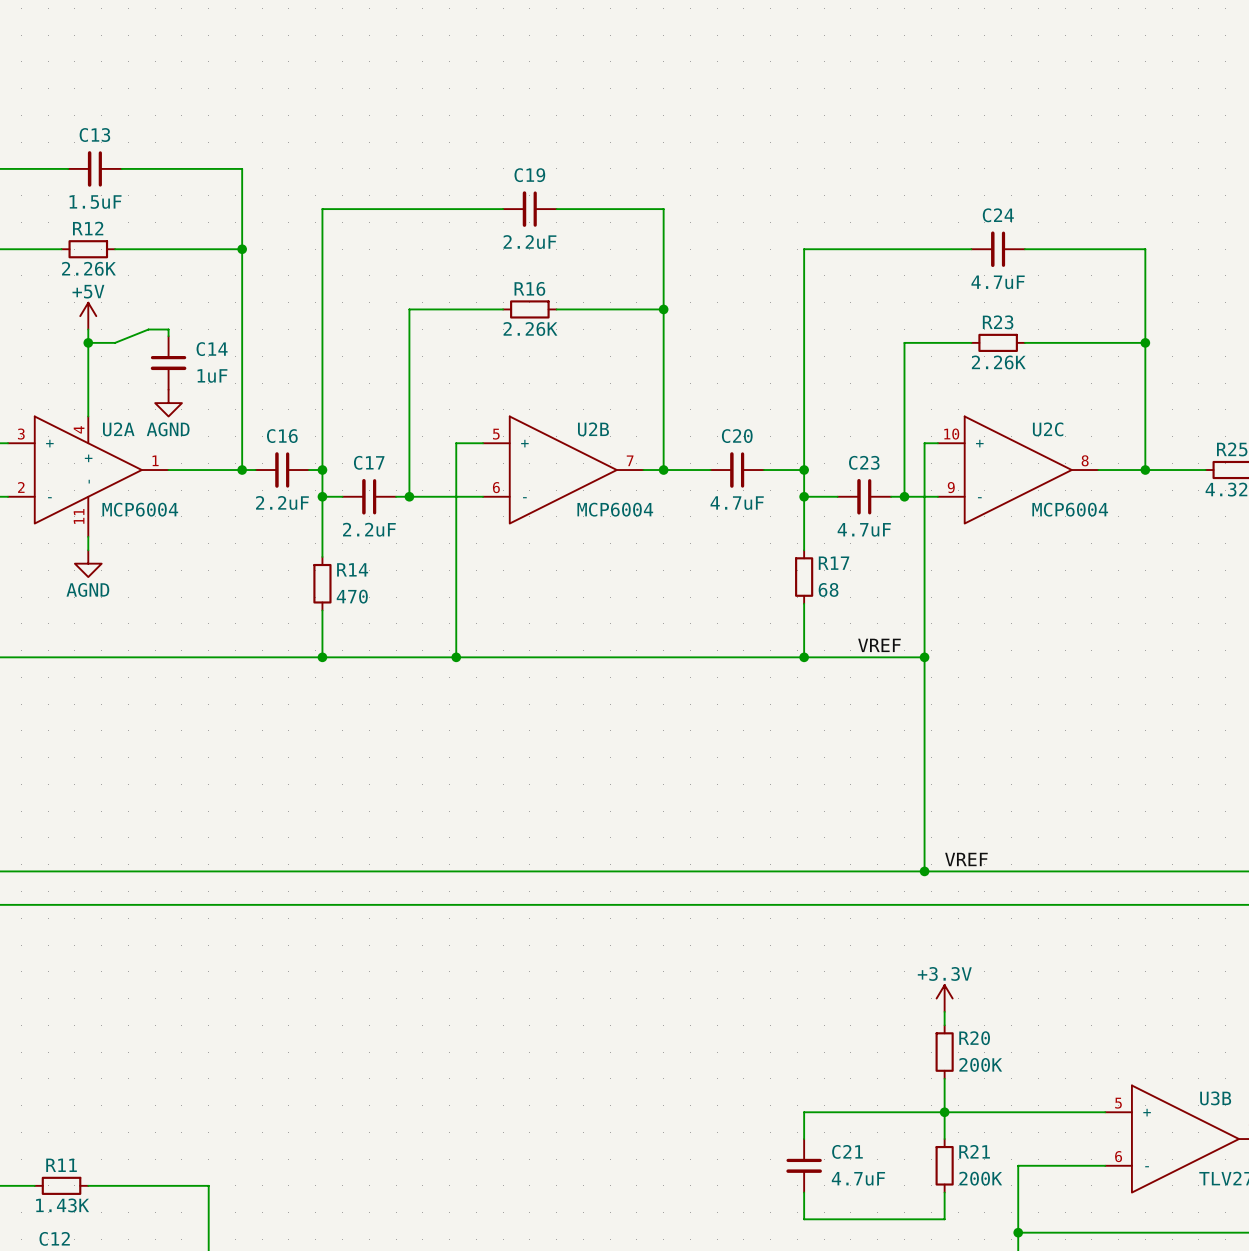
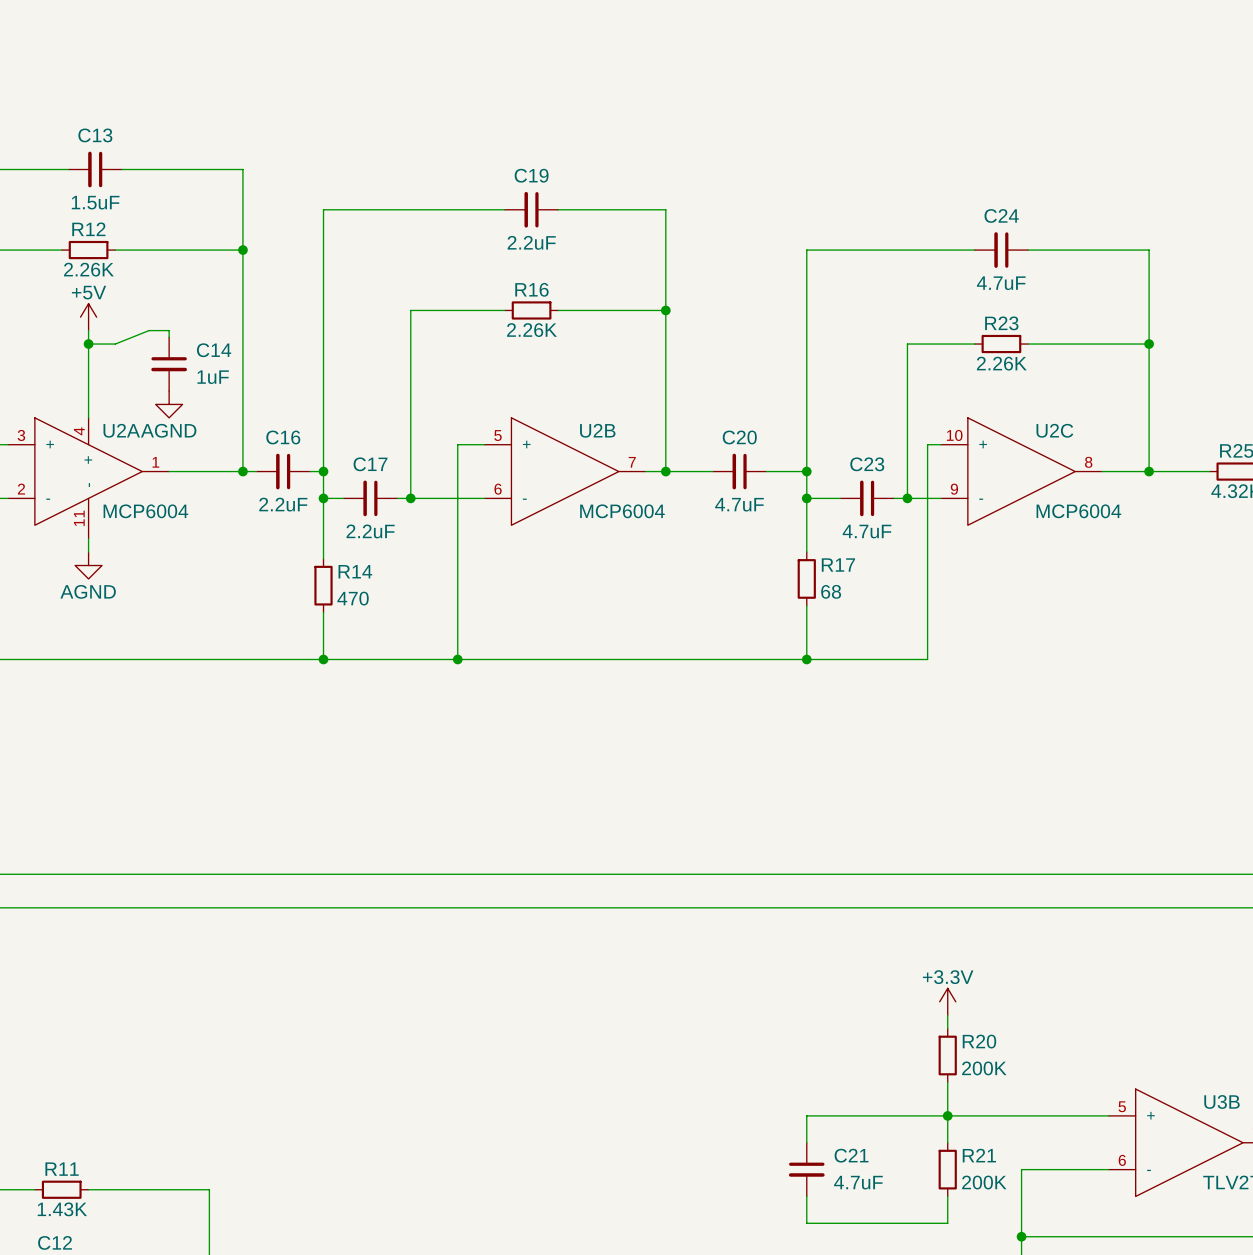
label: VREF (879, 645) -> none
wire: (924, 657) (924, 871) -> none
junction: (924, 657) -> none
label: VREF (966, 859) -> none
junction: (924, 871) -> none

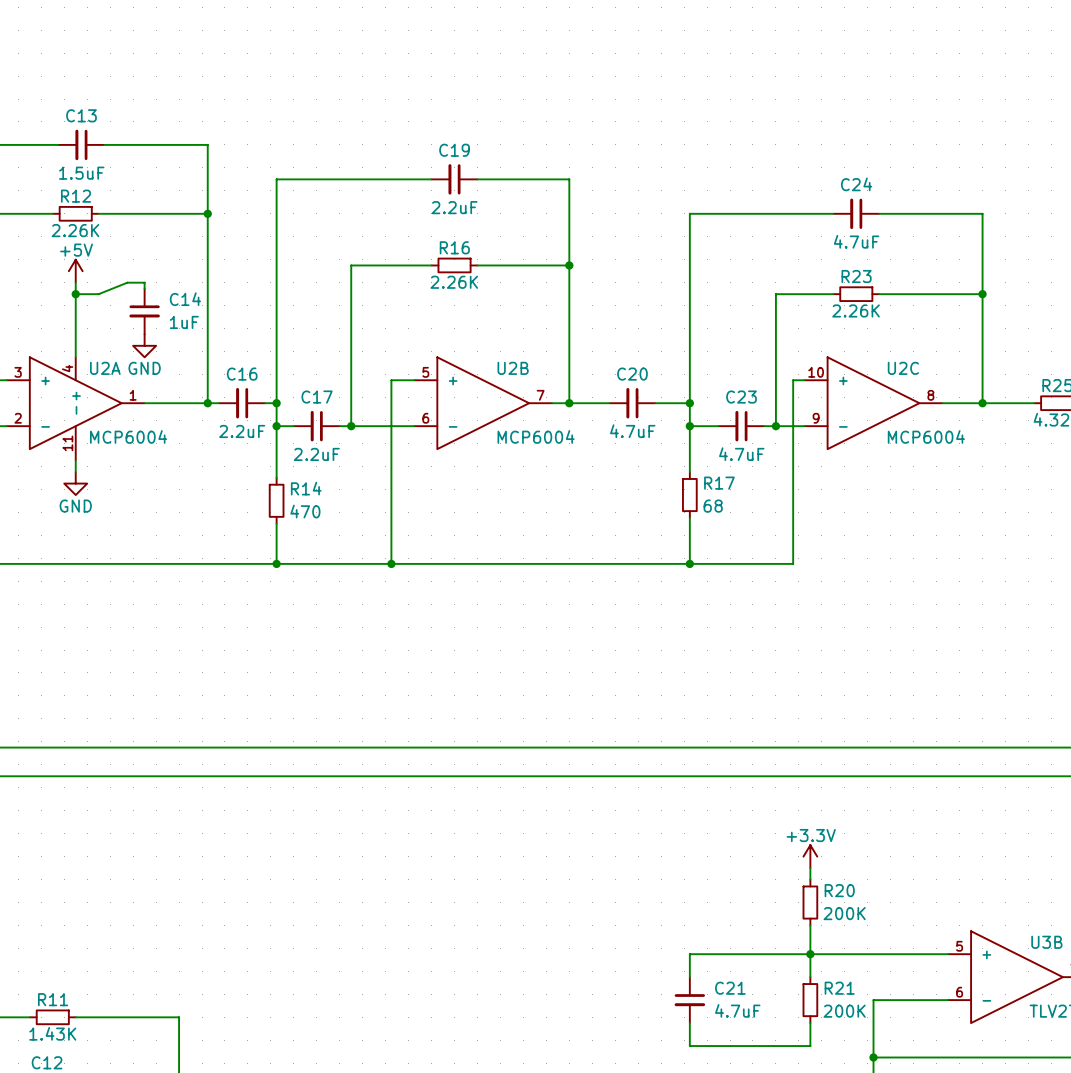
power symbol: AGND (169, 404) -> GND (144, 345)
power symbol: AGND (88, 565) -> GND (75, 483)

